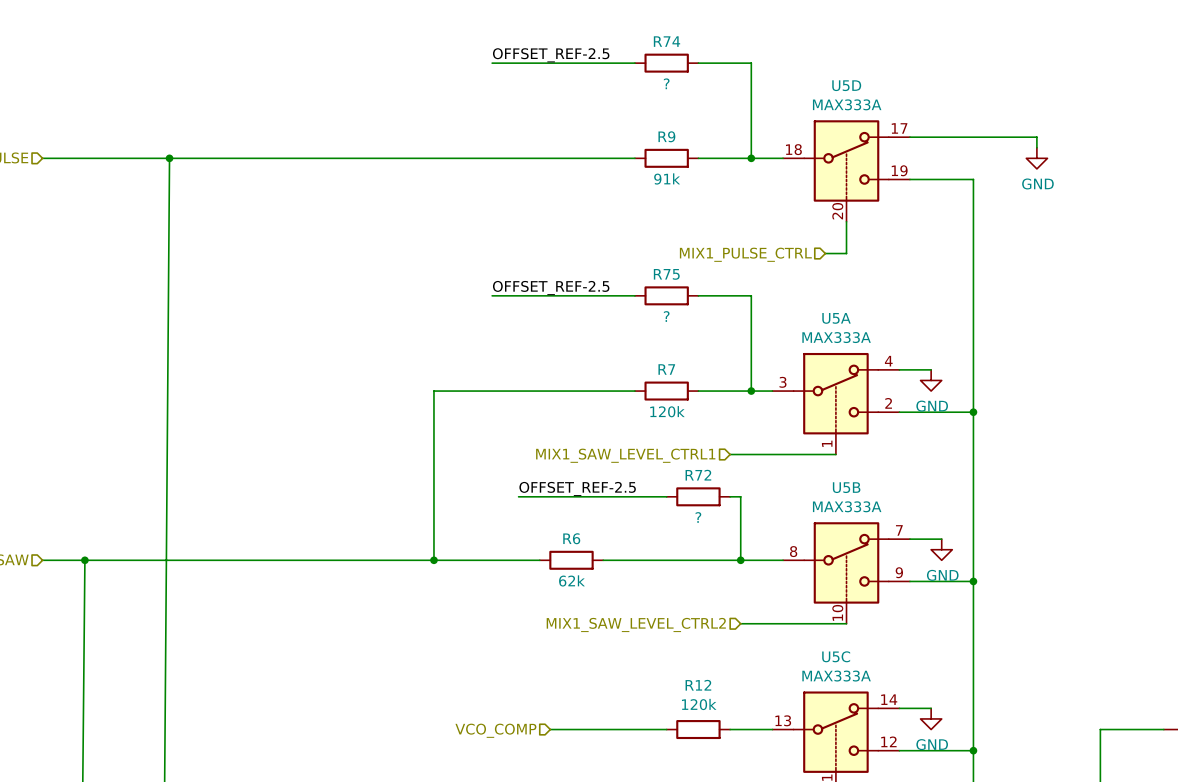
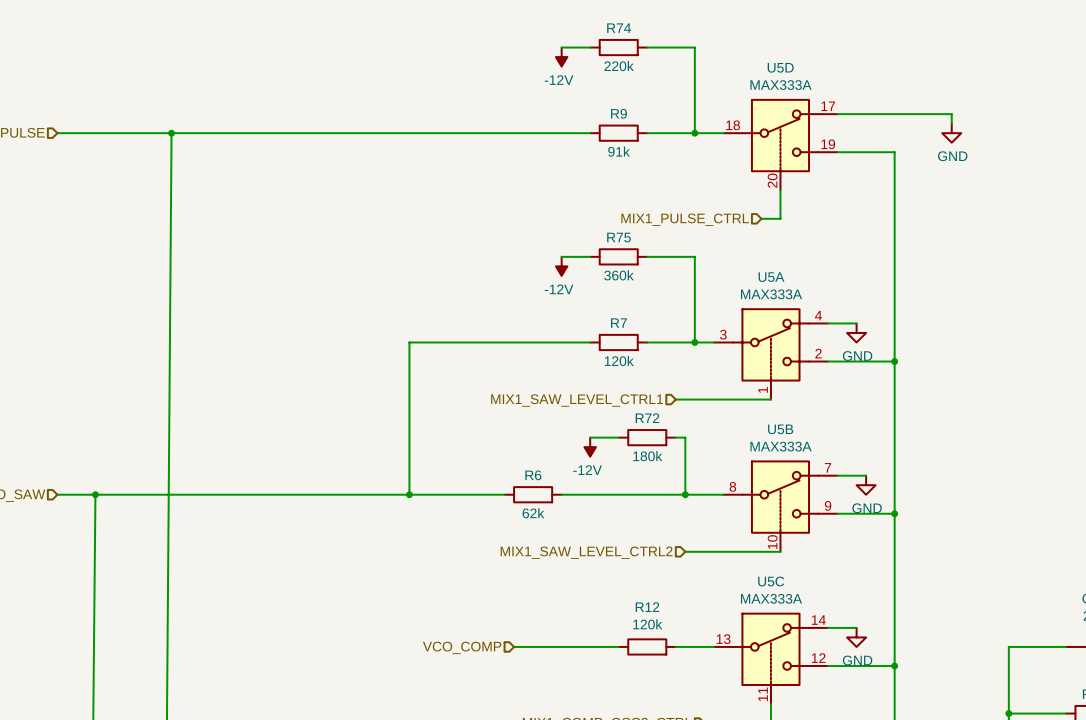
label: OFFSET_REF-2.5 (551, 55) -> none
wire: (492, 63) (603, 63) -> none
power symbol: none -> -12V (561, 57)
R74 value: ? (666, 83) -> 220k (619, 66)
label: OFFSET_REF-2.5 (551, 288) -> none
wire: (492, 295) (603, 295) -> none
power symbol: none -> -12V (561, 266)
R75 value: ? (666, 316) -> 360k (619, 275)
label: OFFSET_REF-2.5 (577, 489) -> none
wire: (518, 496) (634, 496) -> none
power symbol: none -> -12V (590, 447)
R72 value: ? (698, 517) -> 180k (647, 456)

